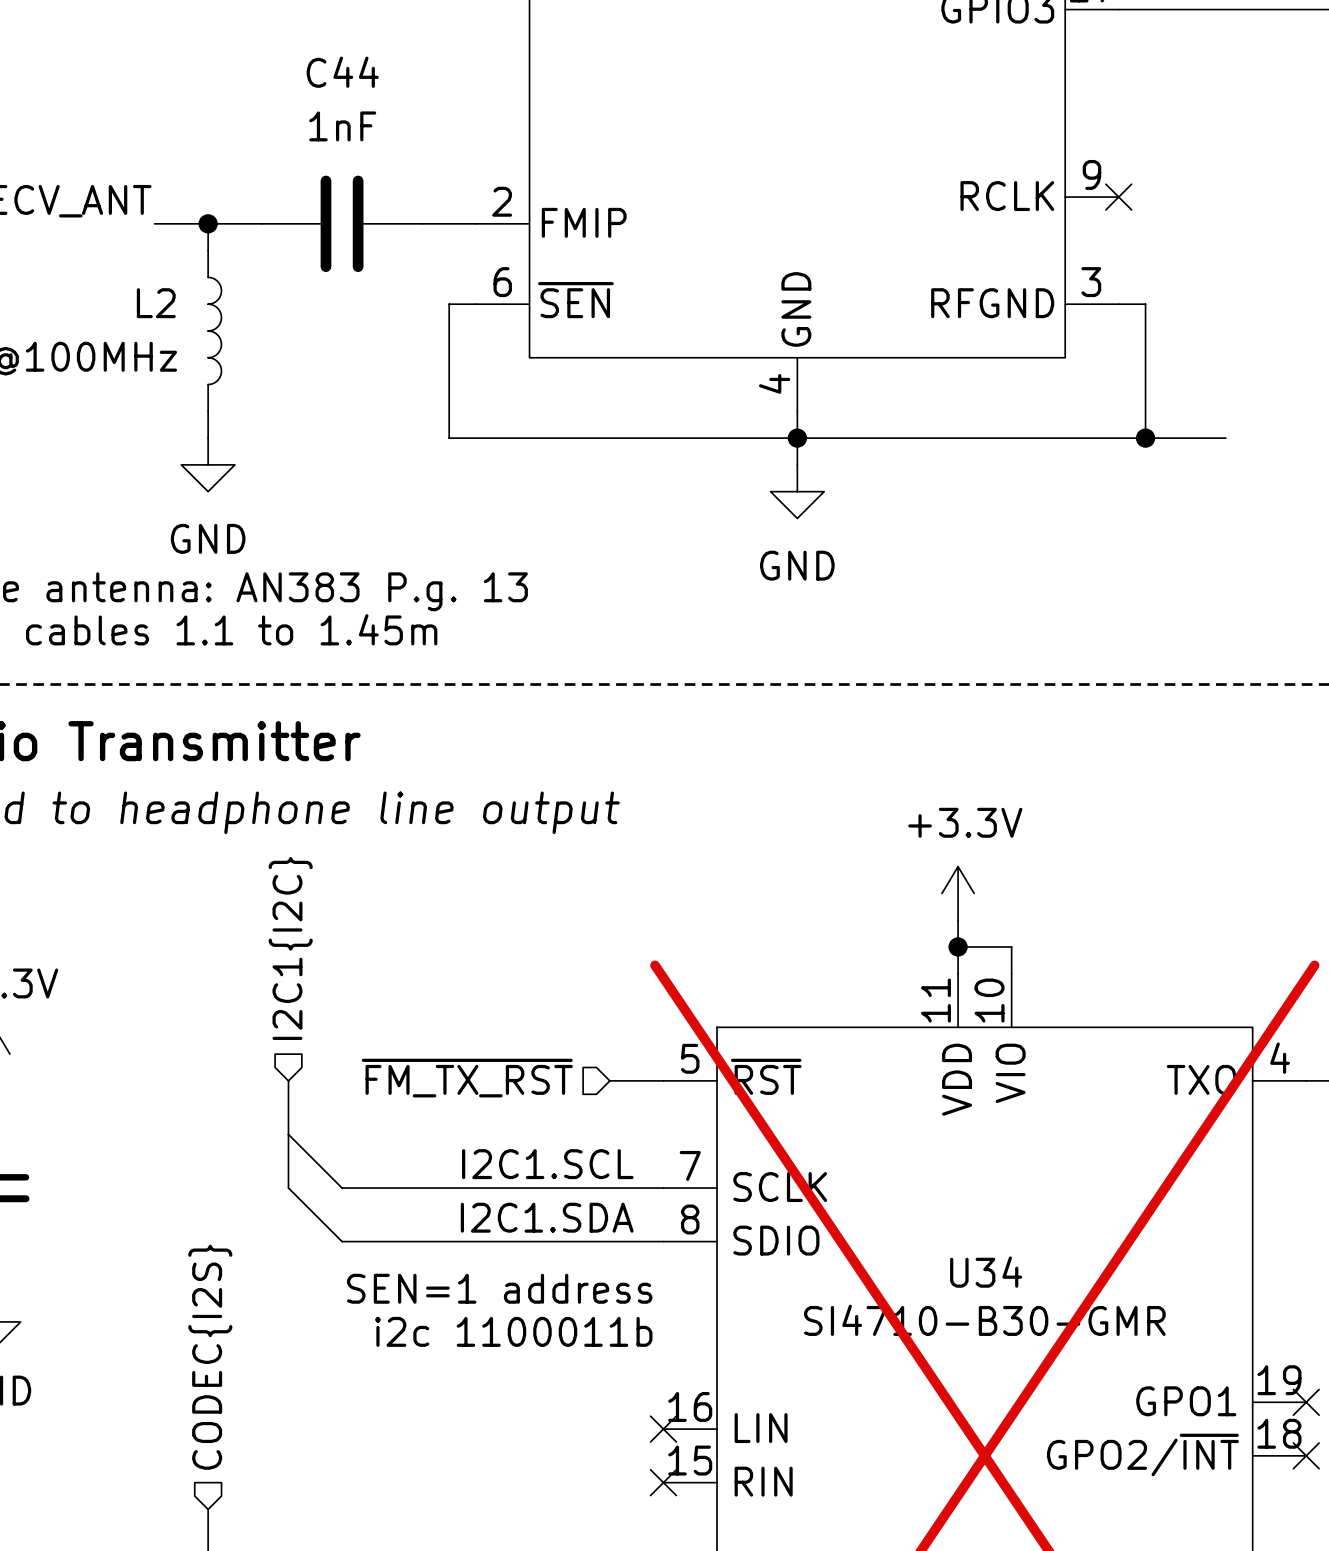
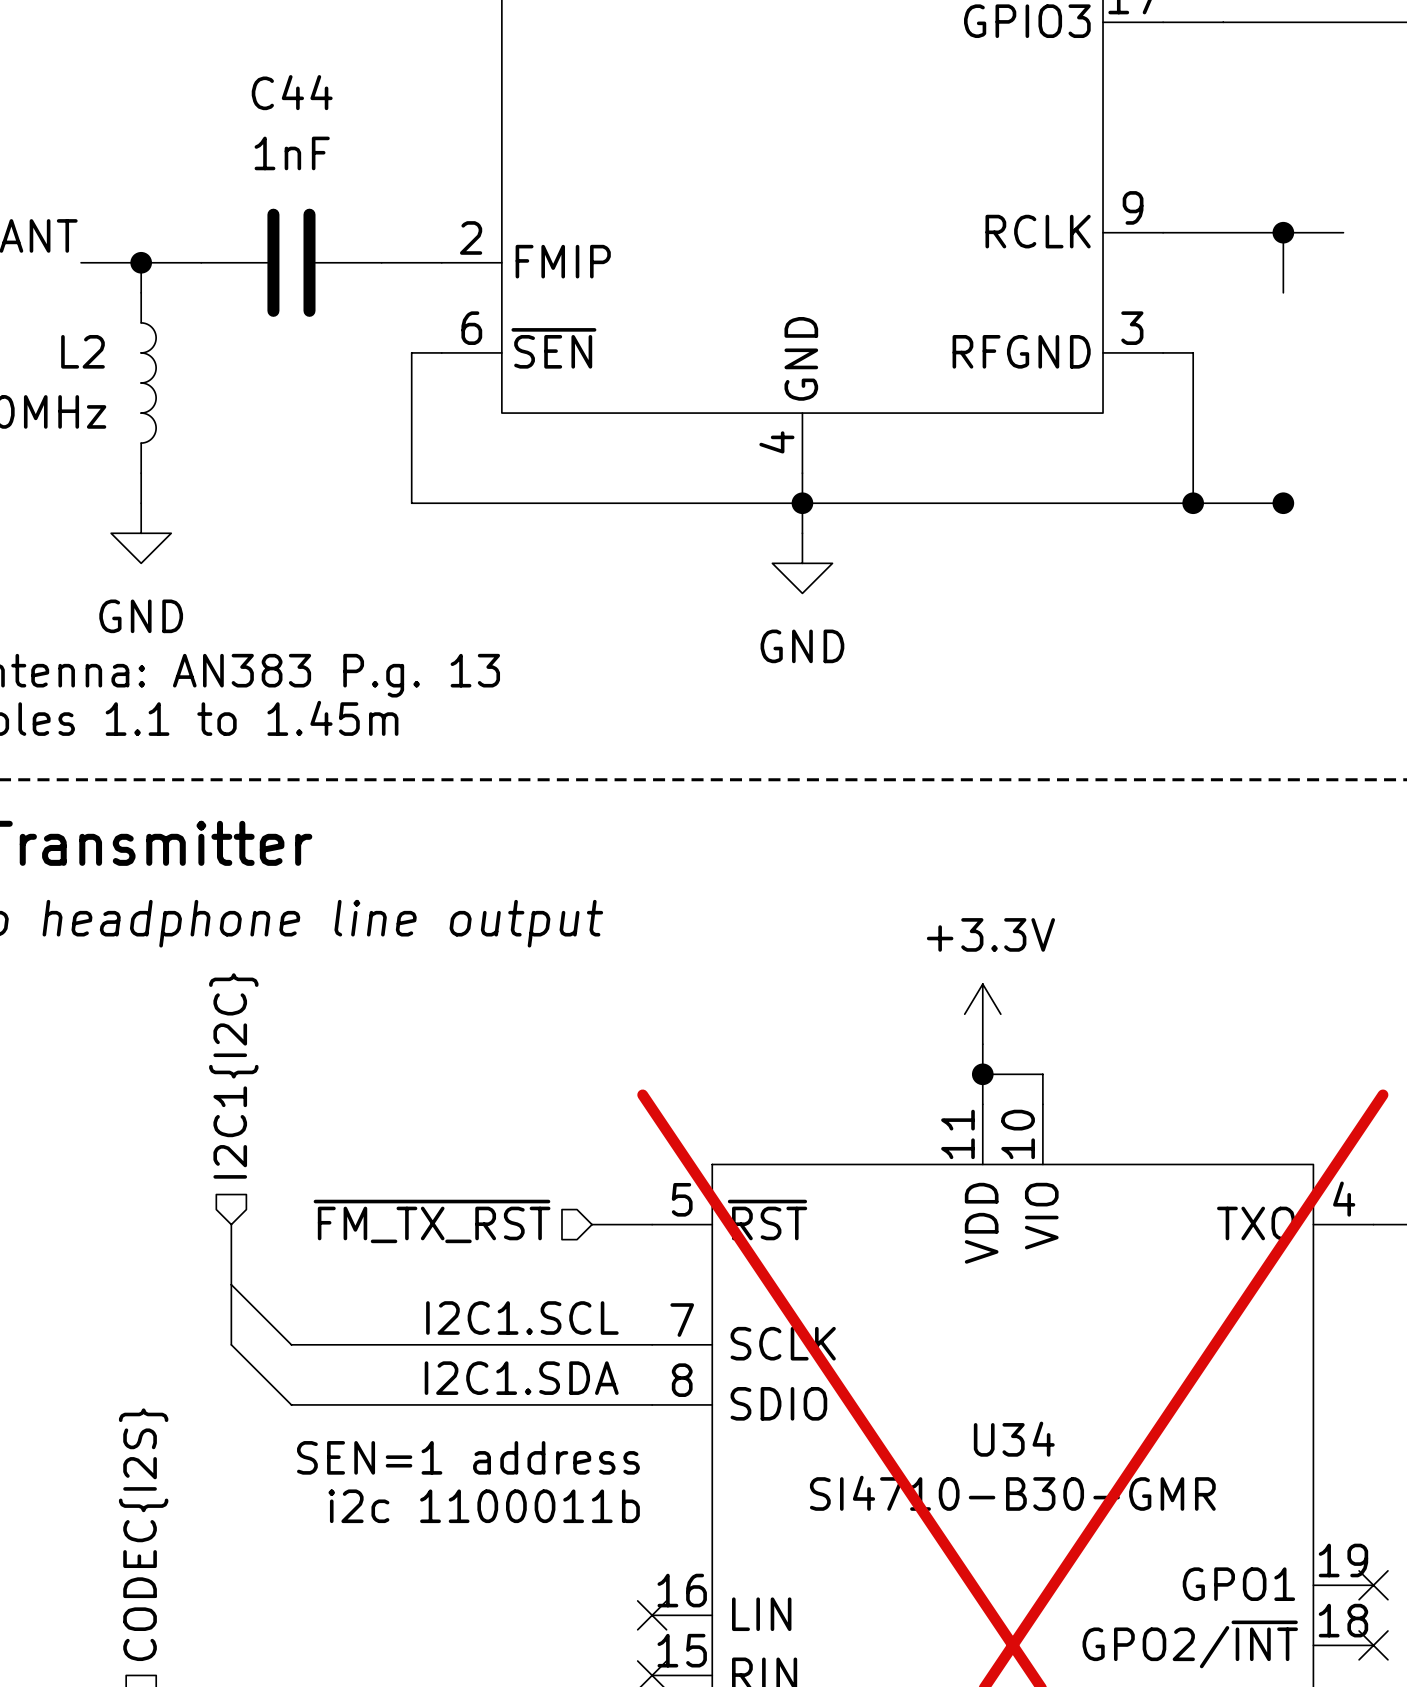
wire: none -> (1163, 232) (1343, 232)
no-connect mark: (1118, 197) -> none
wire: none -> (1283, 232) (1283, 292)
junction: none -> (1283, 232)
junction: none -> (1283, 503)

